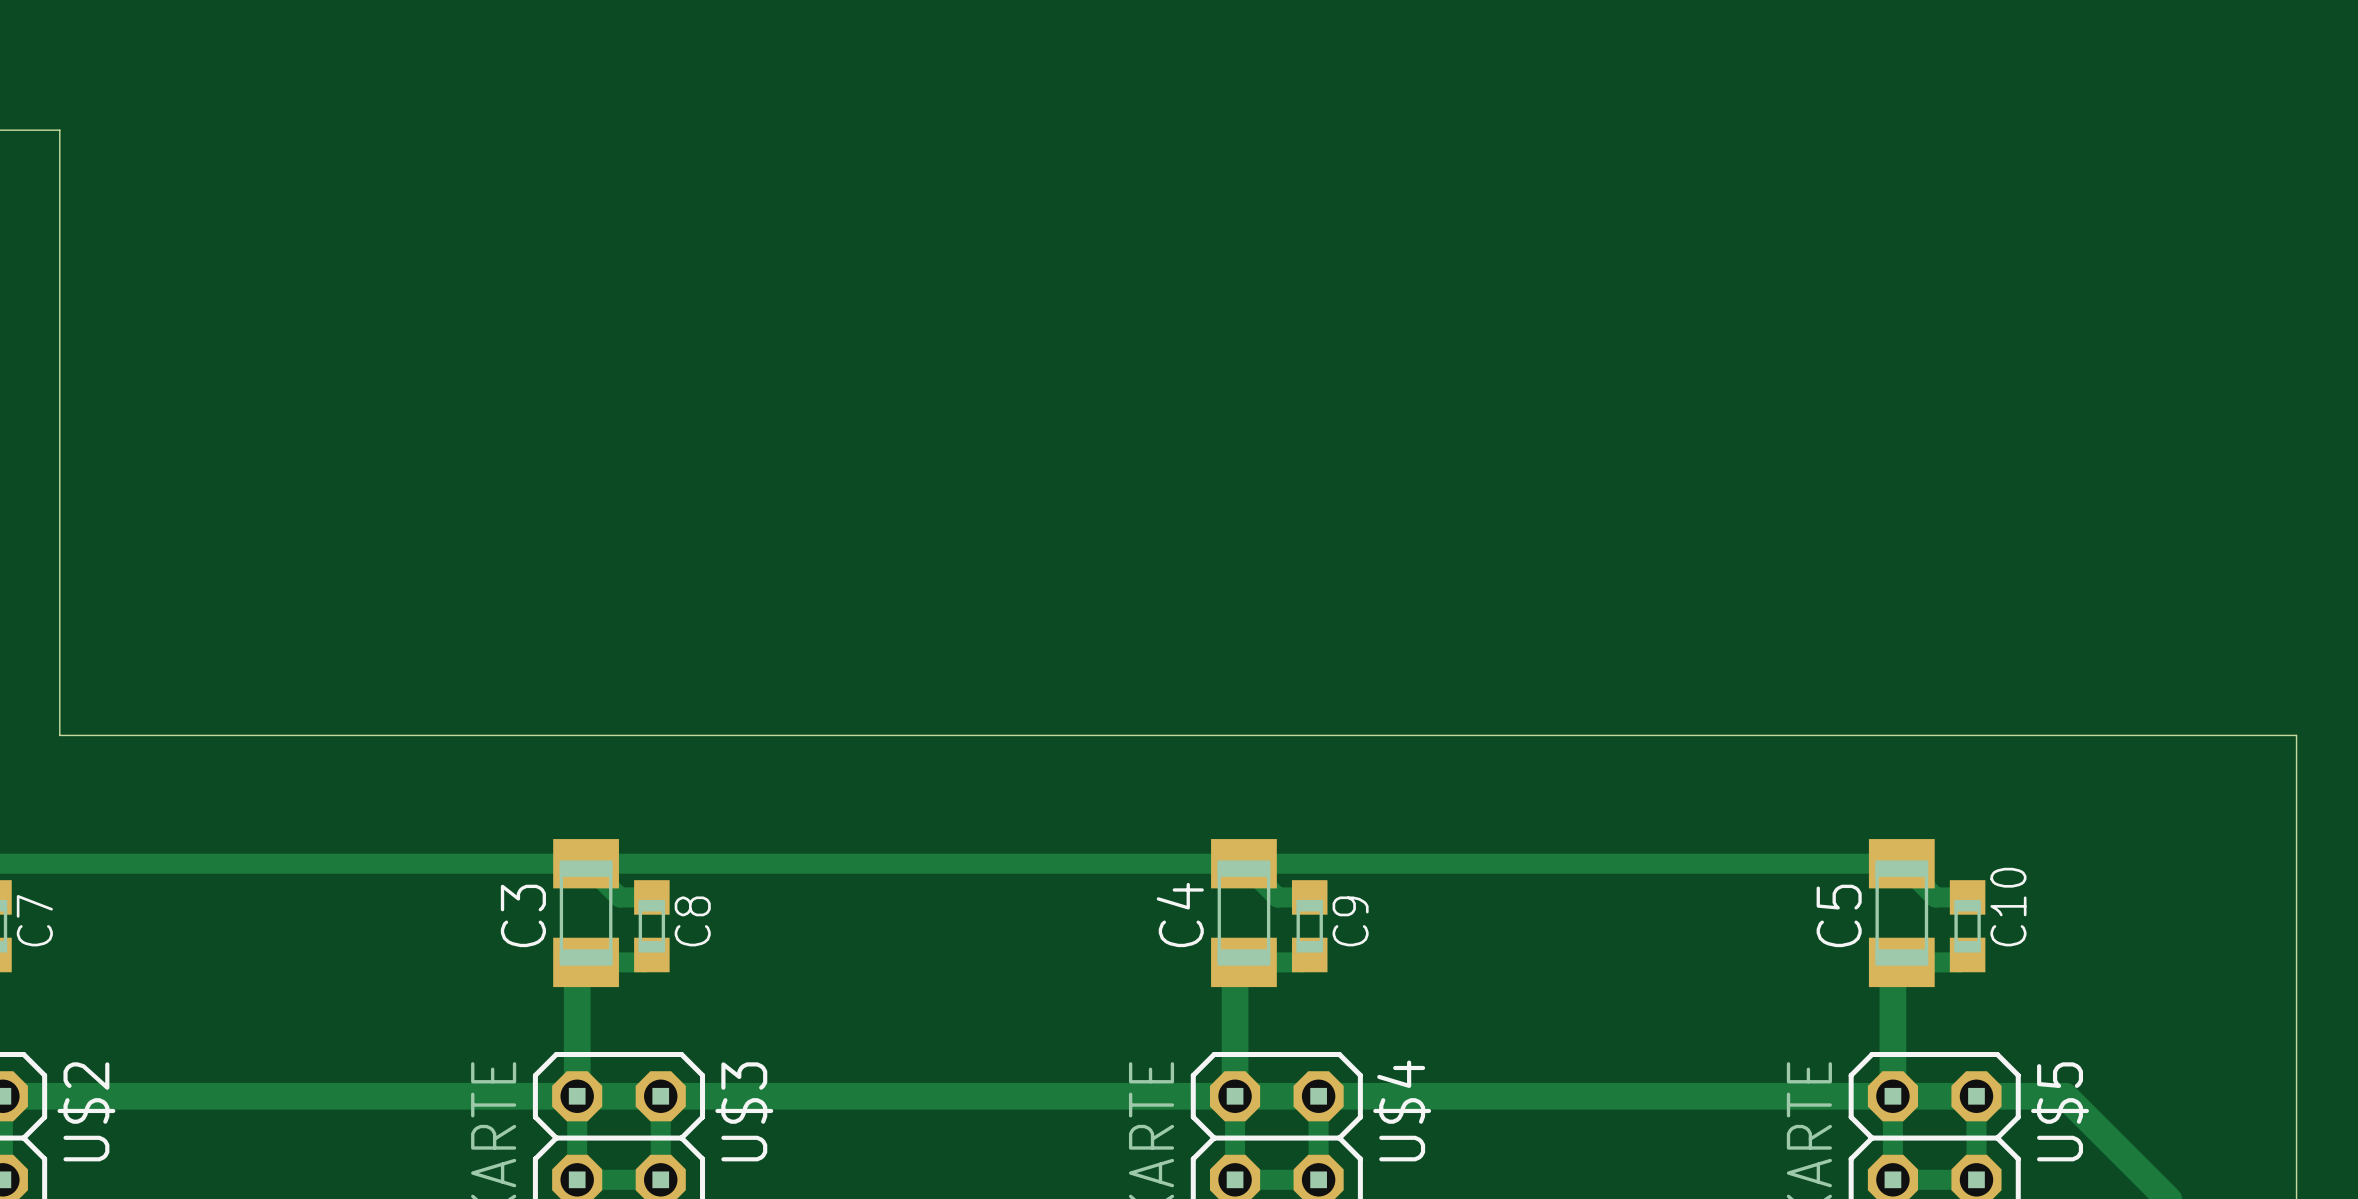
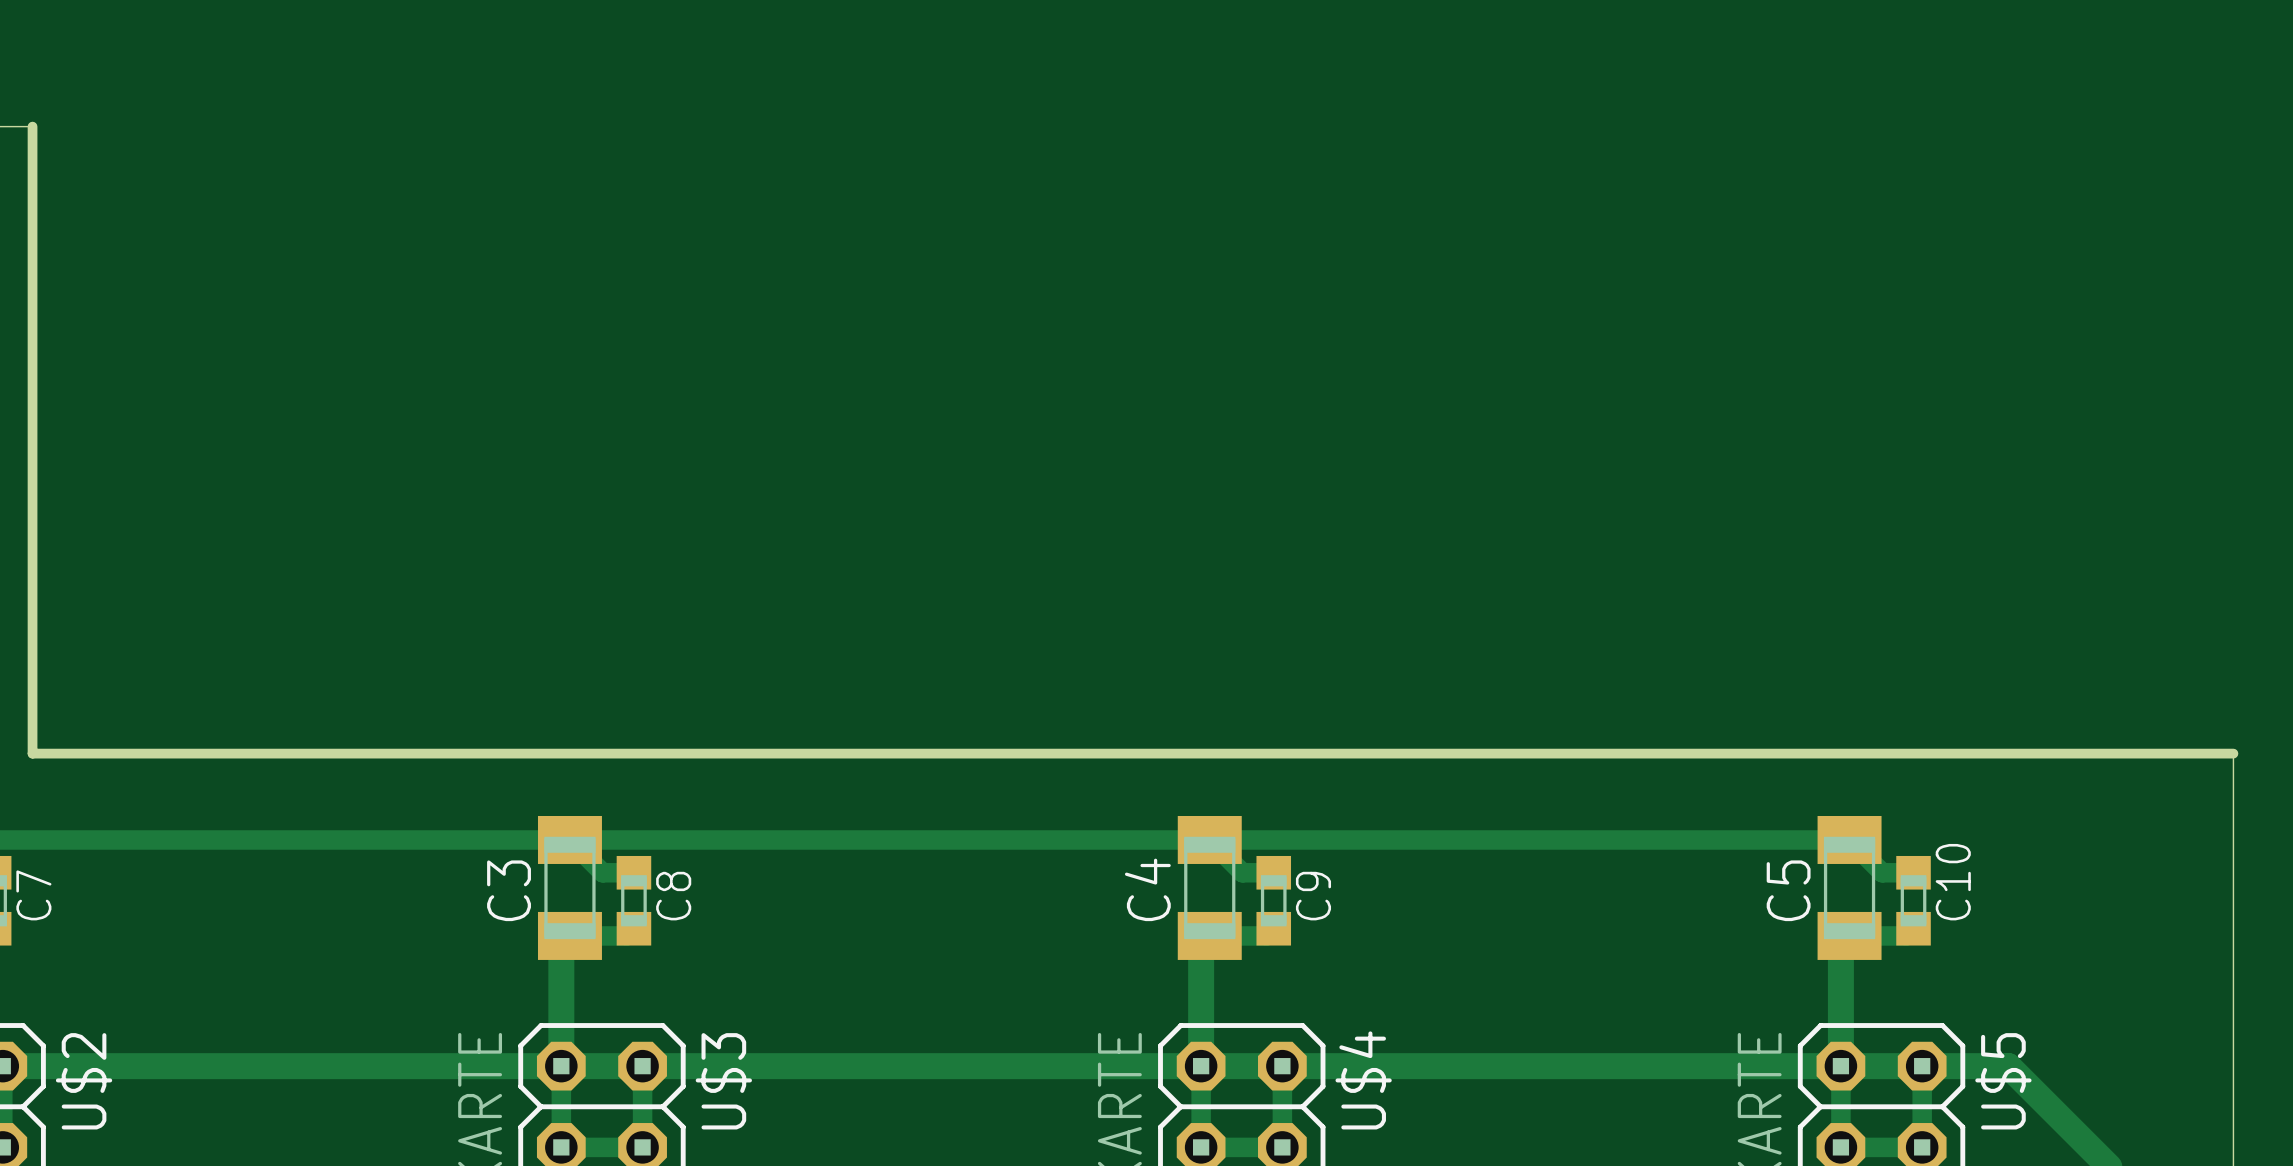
board edge: (33, 130) (59, 130) (59, 735) (2296, 735) (2296, 774) -> (32, 126) (32, 753) (2233, 753)

